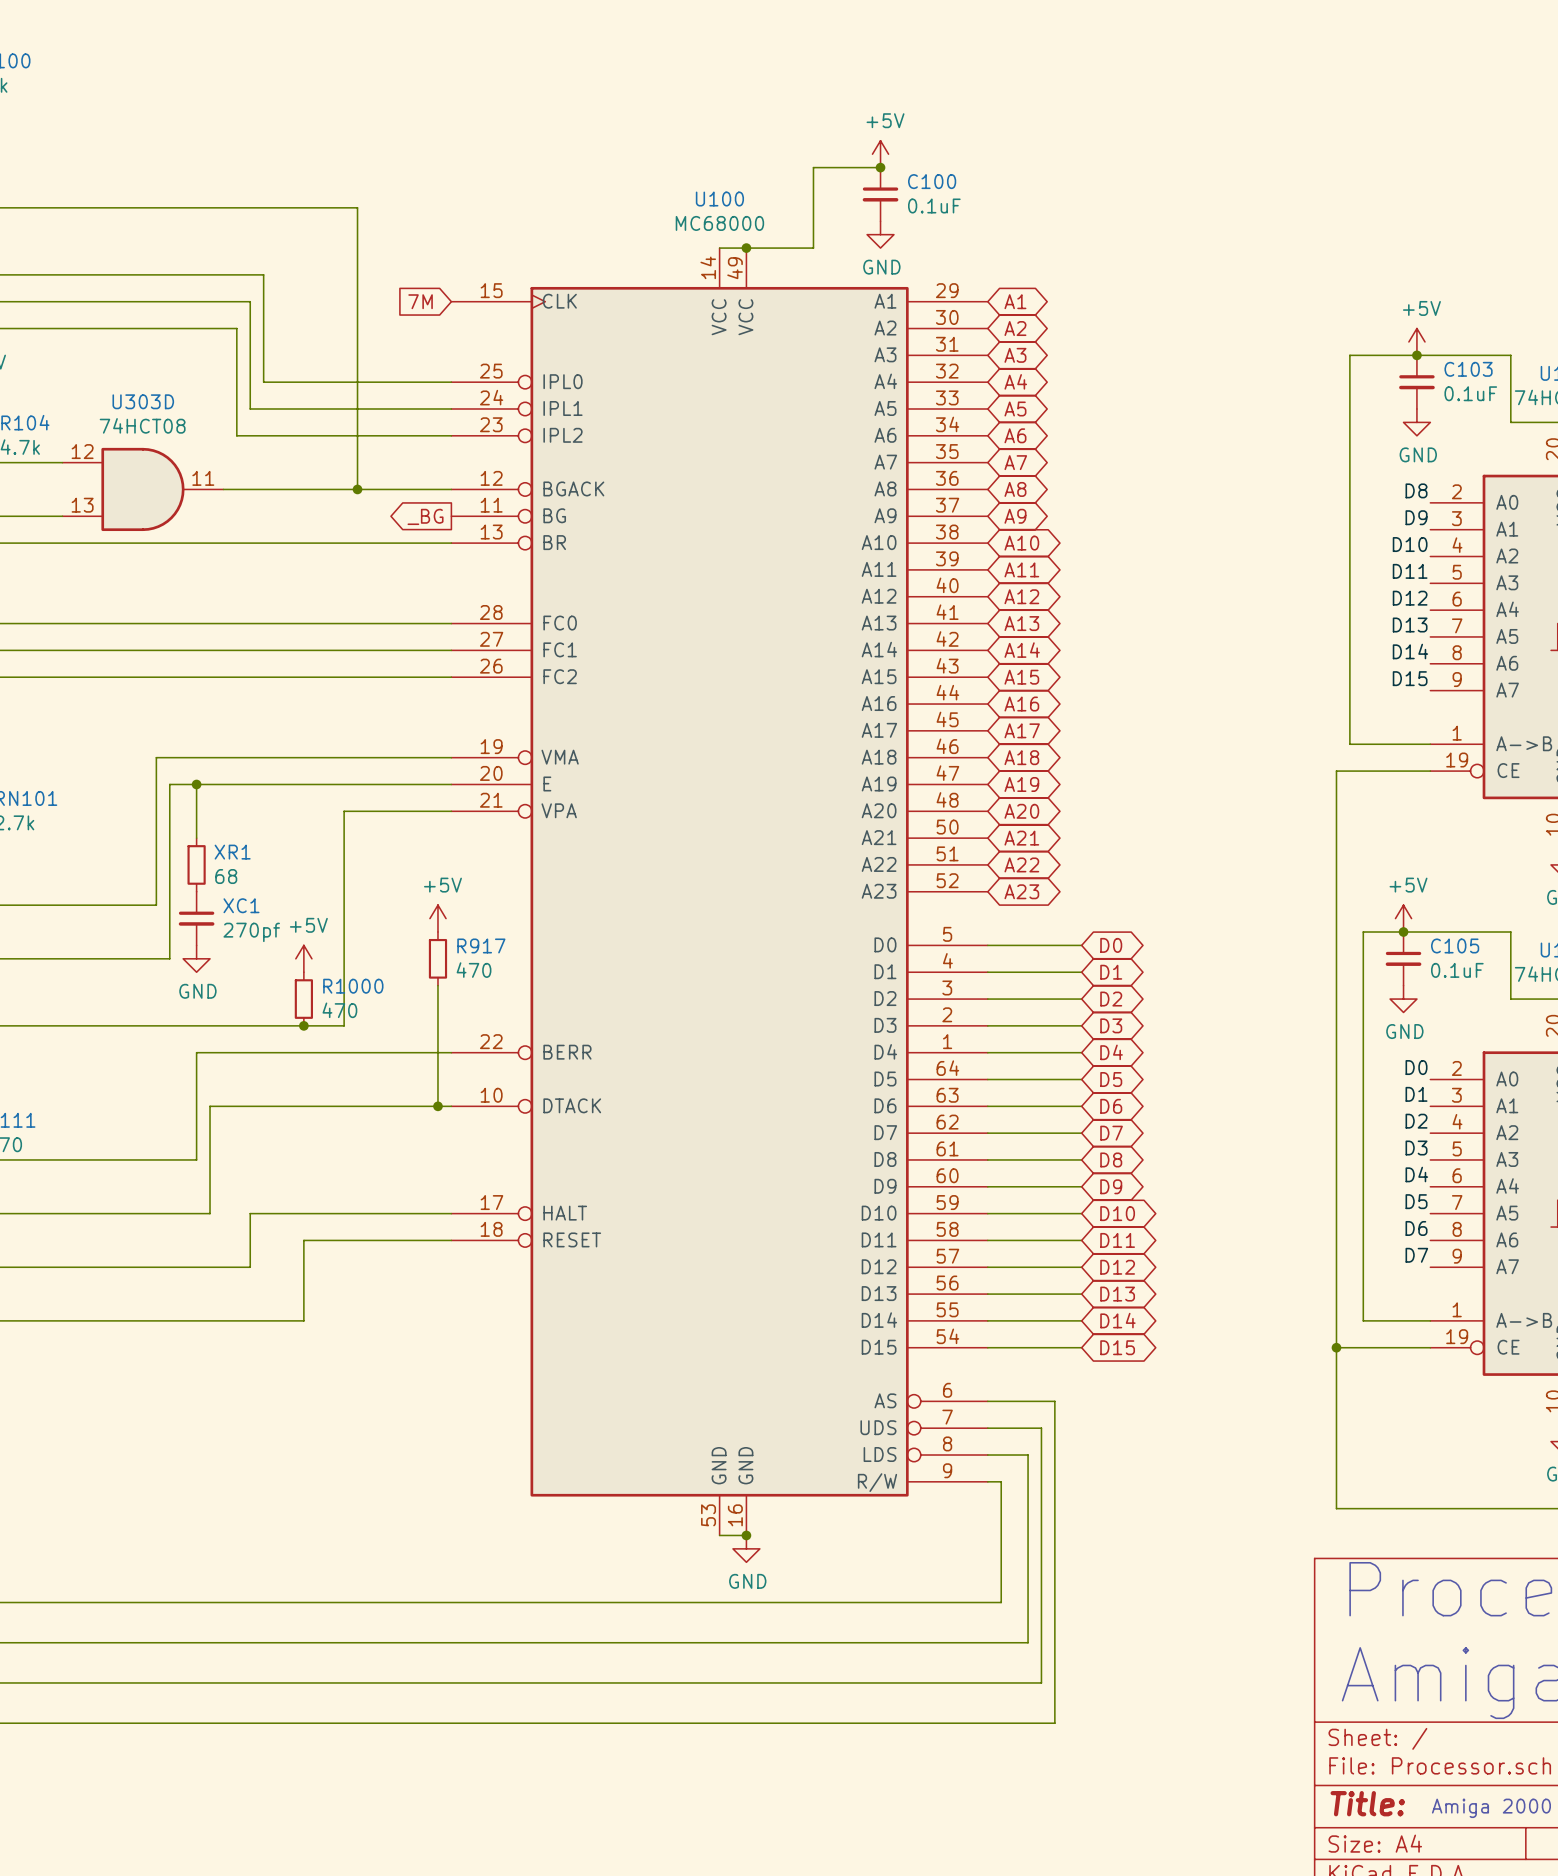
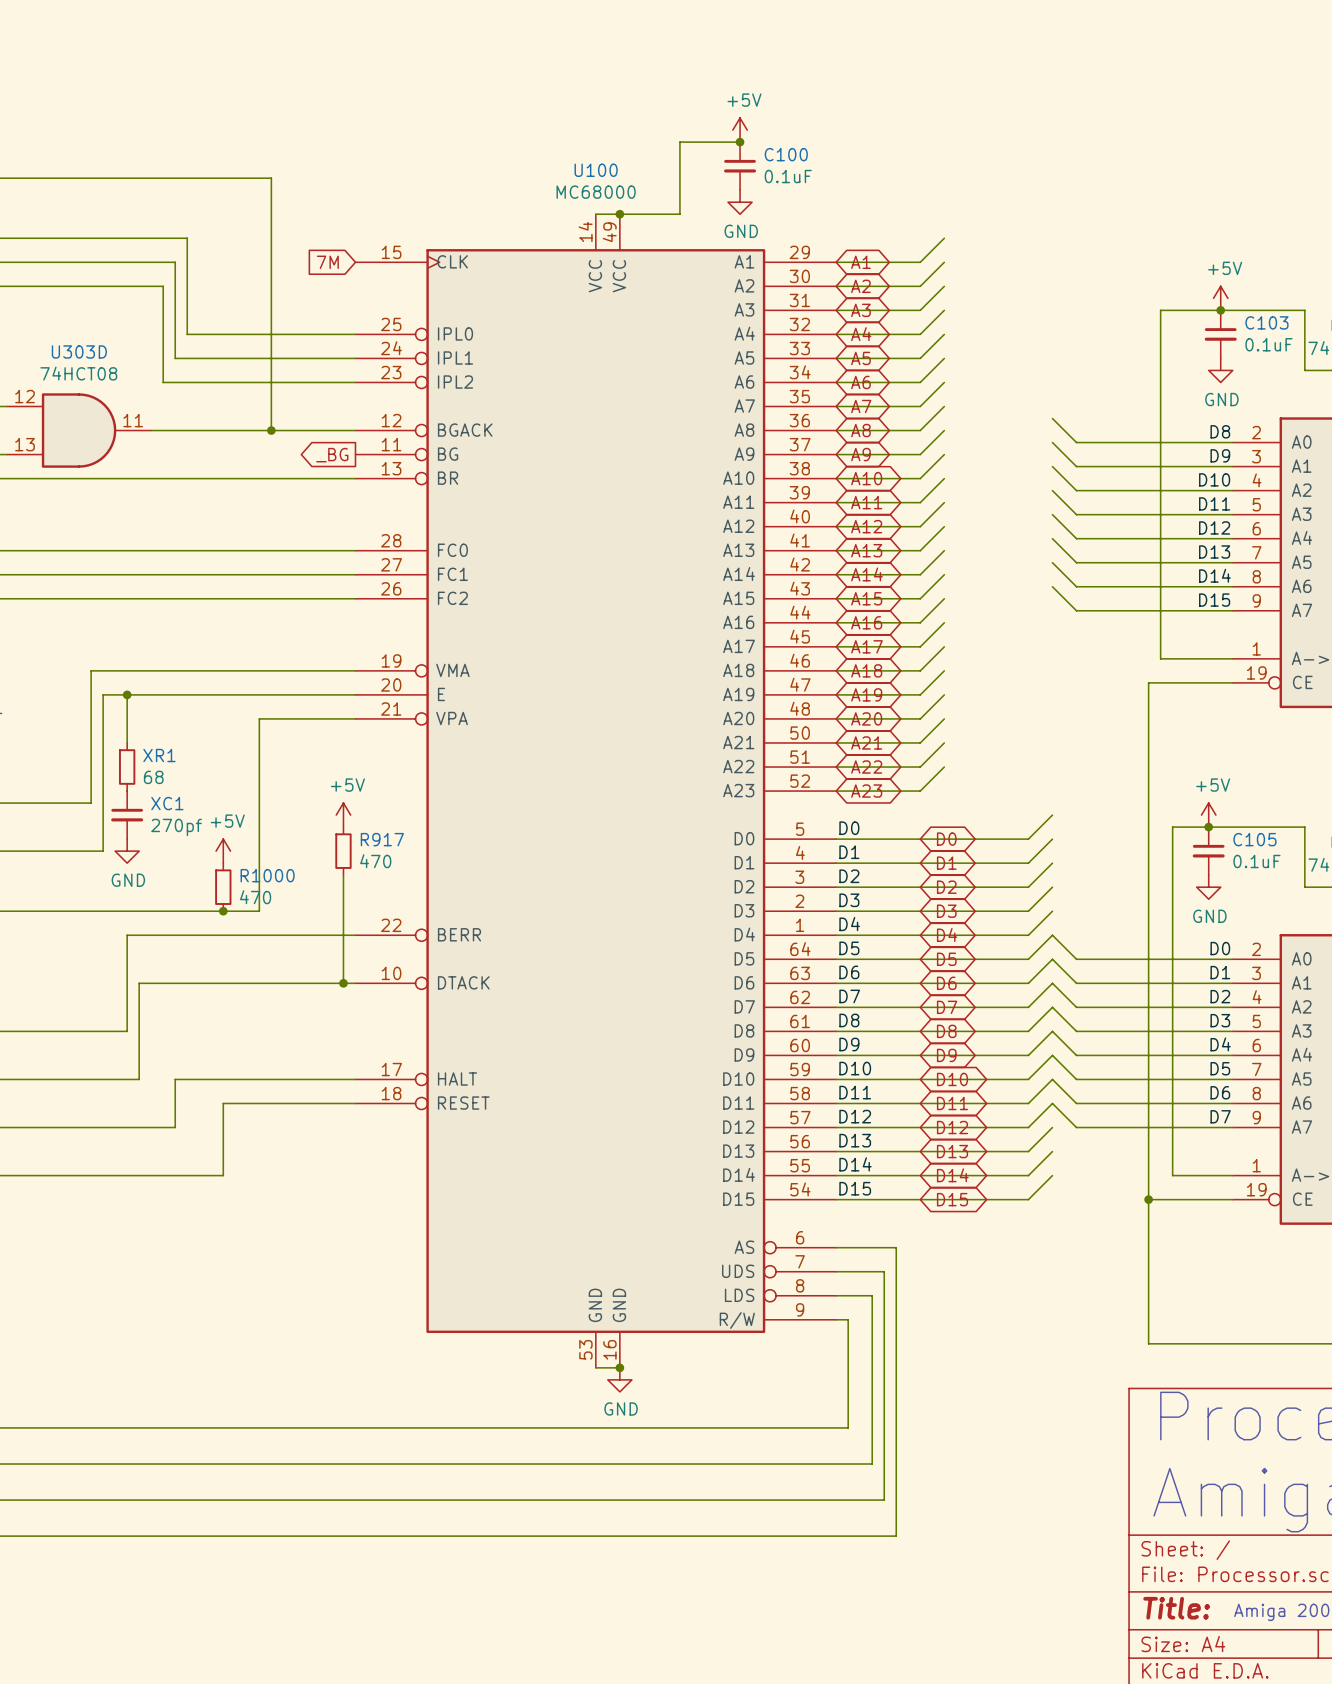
wire: none -> (944, 238) (920, 262) (836, 262)
wire: none -> (944, 262) (920, 286) (836, 286)
wire: none -> (944, 286) (920, 310) (836, 310)
wire: none -> (944, 310) (920, 334) (836, 334)
wire: none -> (944, 334) (920, 358) (836, 358)
wire: none -> (944, 358) (920, 382) (836, 382)
wire: none -> (944, 382) (920, 406) (836, 406)
wire: none -> (944, 406) (920, 430) (836, 430)
wire: none -> (1052, 418) (1076, 442) (1232, 442)
wire: none -> (944, 430) (920, 454) (836, 454)
wire: none -> (1052, 442) (1076, 466) (1232, 466)
wire: none -> (944, 454) (920, 478) (836, 478)
wire: none -> (1052, 466) (1076, 490) (1232, 490)
wire: none -> (944, 478) (920, 502) (836, 502)
wire: none -> (1052, 490) (1076, 514) (1232, 514)
wire: none -> (944, 502) (920, 526) (836, 526)
wire: none -> (1052, 514) (1076, 538) (1232, 538)
wire: none -> (944, 526) (920, 550) (836, 550)
wire: none -> (1052, 538) (1076, 562) (1232, 562)
wire: none -> (944, 550) (920, 574) (836, 574)
wire: none -> (1052, 562) (1076, 586) (1232, 586)
wire: none -> (944, 574) (920, 598) (836, 598)
wire: none -> (1052, 586) (1076, 610) (1232, 610)
wire: none -> (944, 598) (920, 622) (836, 622)
wire: none -> (944, 622) (920, 646) (836, 646)
wire: none -> (944, 646) (920, 670) (836, 670)
wire: none -> (944, 670) (920, 694) (836, 694)
wire: none -> (944, 694) (920, 718) (836, 718)
wire: none -> (944, 718) (920, 742) (836, 742)
wire: none -> (944, 742) (920, 767) (836, 767)
wire: none -> (944, 767) (920, 791) (836, 791)
wire: none -> (1052, 815) (1028, 839) (920, 839)
label: none -> D0 (849, 828)
wire: none -> (1052, 839) (1028, 863) (920, 863)
label: none -> D1 (849, 852)
wire: none -> (1052, 863) (1028, 887) (920, 887)
label: none -> D2 (849, 876)
wire: none -> (1052, 887) (1028, 911) (920, 911)
label: none -> D3 (849, 900)
wire: none -> (1052, 911) (1028, 935) (920, 935)
label: none -> D4 (849, 924)
label: none -> D5 (849, 948)
wire: none -> (920, 959) (1028, 959) (1052, 935) (1076, 959) (1232, 959)
label: none -> D6 (849, 972)
wire: none -> (920, 983) (1028, 983) (1052, 959) (1076, 983) (1232, 983)
label: none -> D7 (849, 996)
wire: none -> (920, 1007) (1028, 1007) (1052, 983) (1076, 1007) (1232, 1007)
label: none -> D8 (849, 1020)
wire: none -> (920, 1031) (1028, 1031) (1052, 1007) (1076, 1031) (1232, 1031)
label: none -> D9 (849, 1044)
wire: none -> (920, 1055) (1028, 1055) (1052, 1031) (1076, 1055) (1232, 1055)
label: none -> D10 (855, 1068)
wire: none -> (920, 1079) (1028, 1079) (1052, 1055) (1076, 1079) (1232, 1079)
label: none -> D11 (855, 1092)
wire: none -> (920, 1103) (1028, 1103) (1052, 1079) (1076, 1103) (1232, 1103)
label: none -> D12 (855, 1116)
wire: none -> (920, 1127) (1028, 1127) (1052, 1103) (1076, 1127) (1232, 1127)
wire: none -> (1052, 1127) (1028, 1151) (920, 1151)
label: none -> D13 (855, 1140)
wire: none -> (1052, 1151) (1028, 1175) (920, 1175)
label: none -> D14 (855, 1164)
wire: none -> (1052, 1175) (1028, 1199) (920, 1199)
label: none -> D15 (855, 1188)

